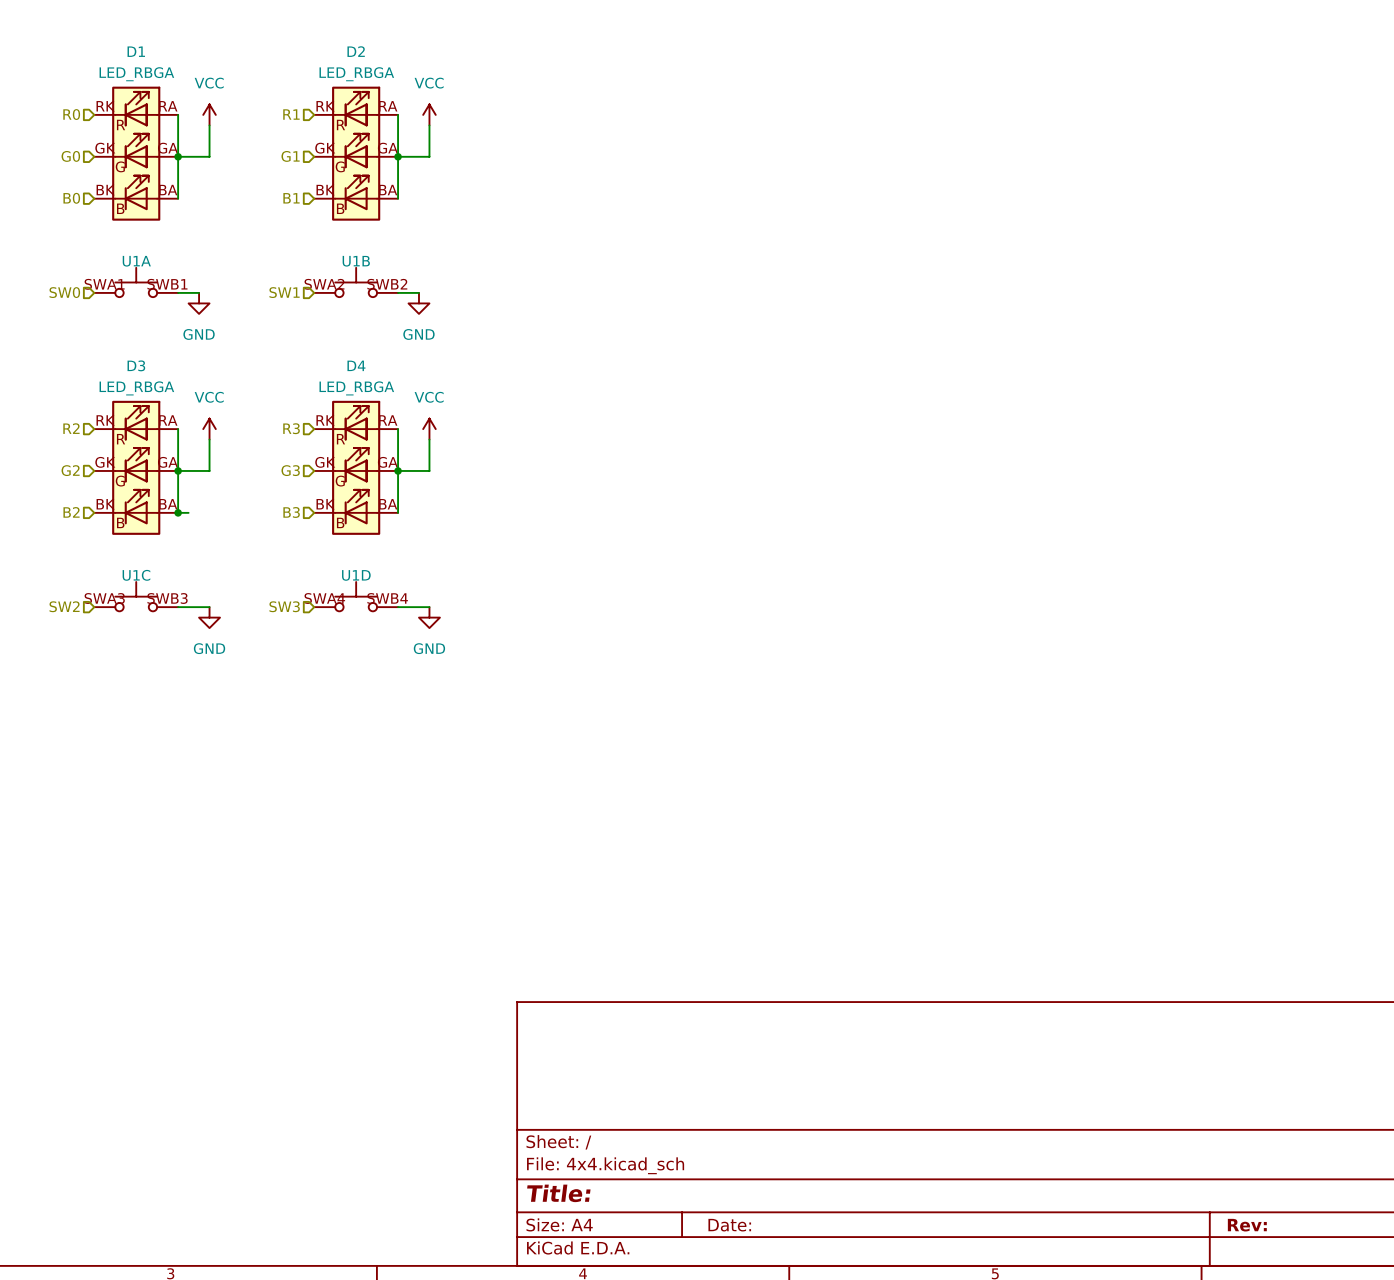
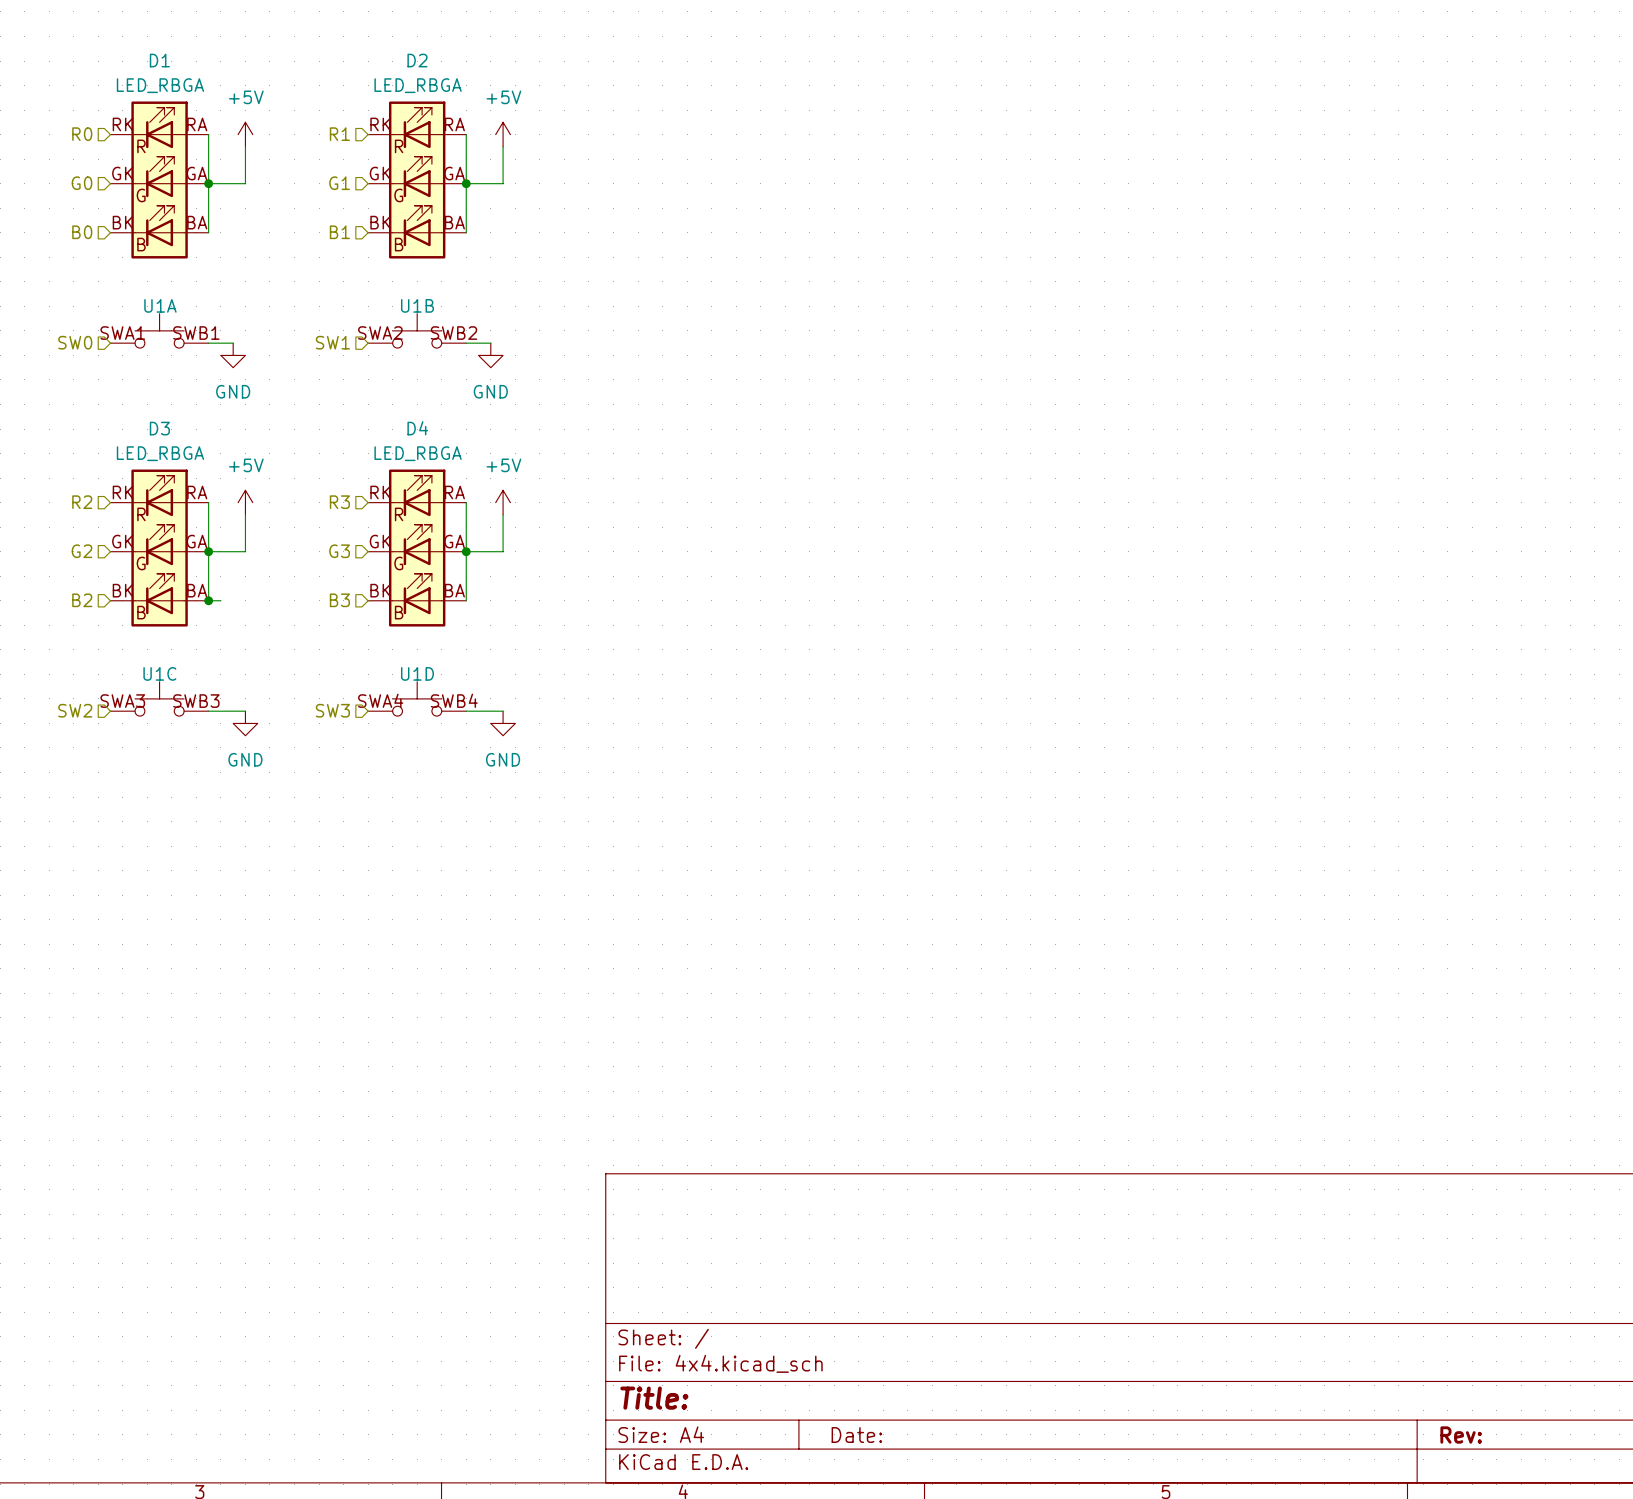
power symbol: VCC (209, 114) -> +5V (245, 134)
power symbol: VCC (429, 114) -> +5V (503, 134)
power symbol: VCC (209, 429) -> +5V (245, 502)
power symbol: VCC (429, 429) -> +5V (503, 502)

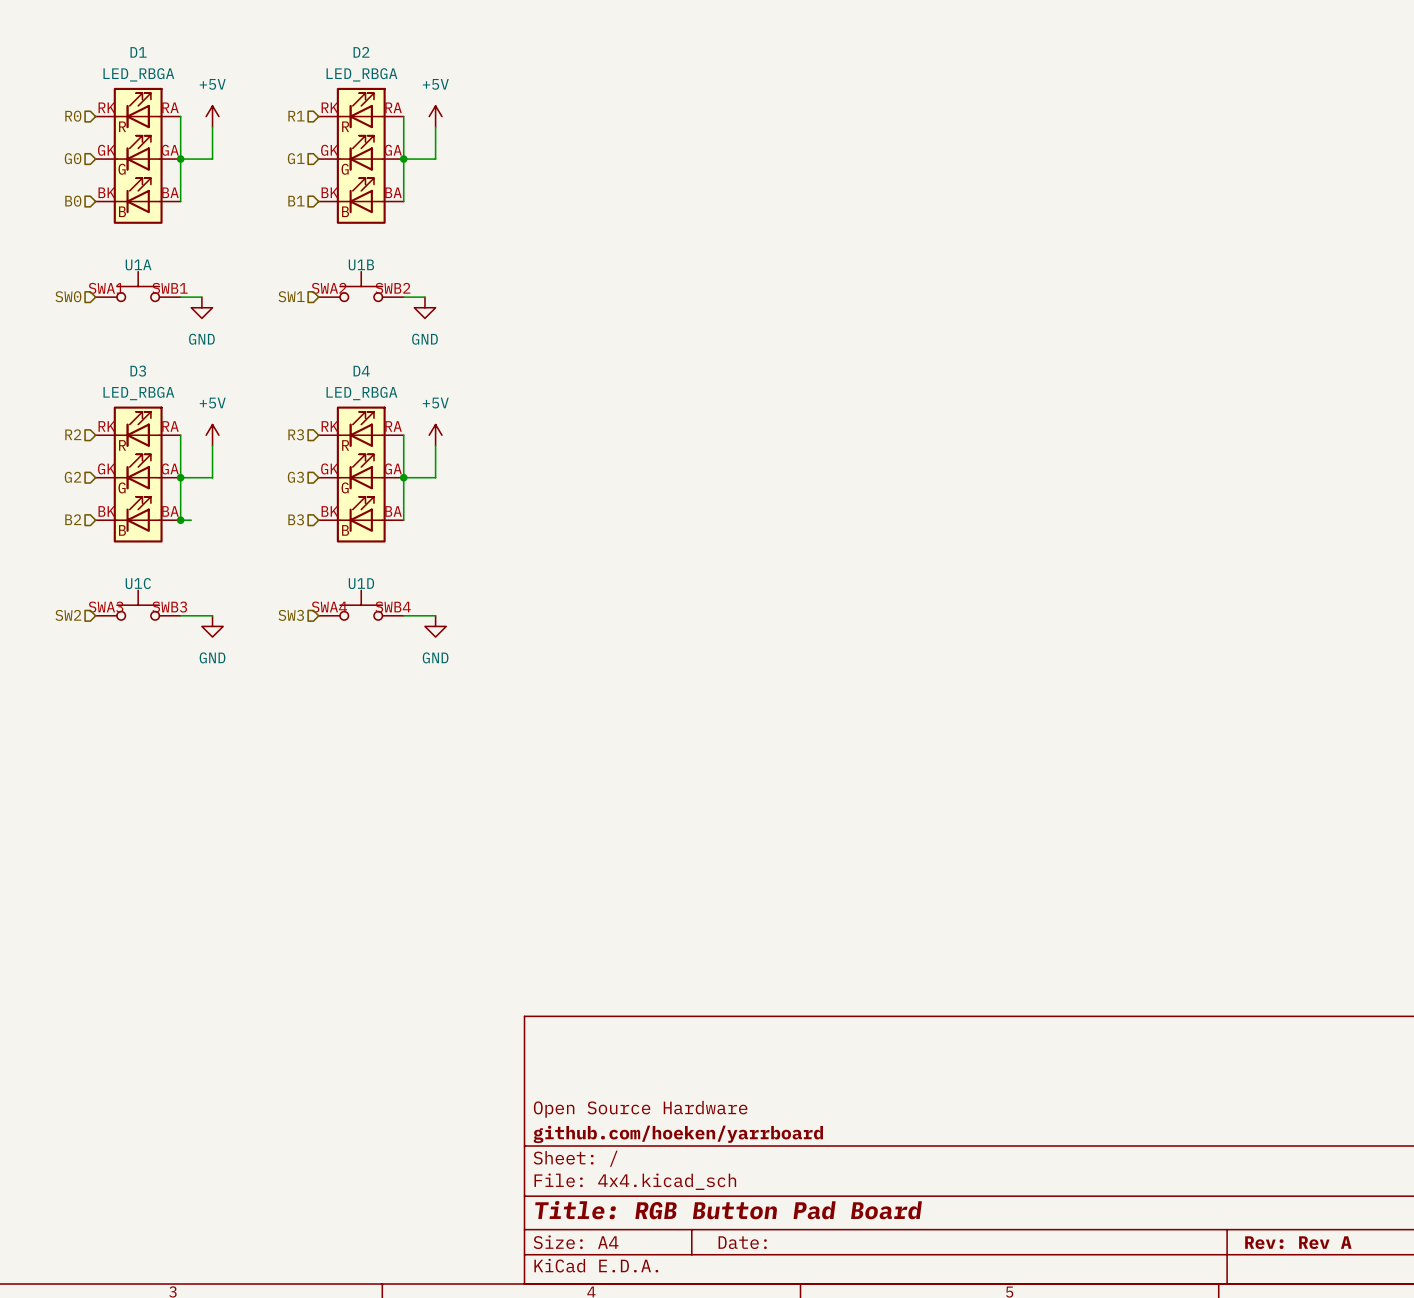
title block: none -> Open Source Hardware (640, 1109)
title block: none -> github.com/hoeken/yarrboard (678, 1134)
title block: Title: (654, 1398) -> Title: RGB Button Pad Board (728, 1210)
title block: Rev: (1461, 1435) -> Rev: Rev A (1298, 1242)

